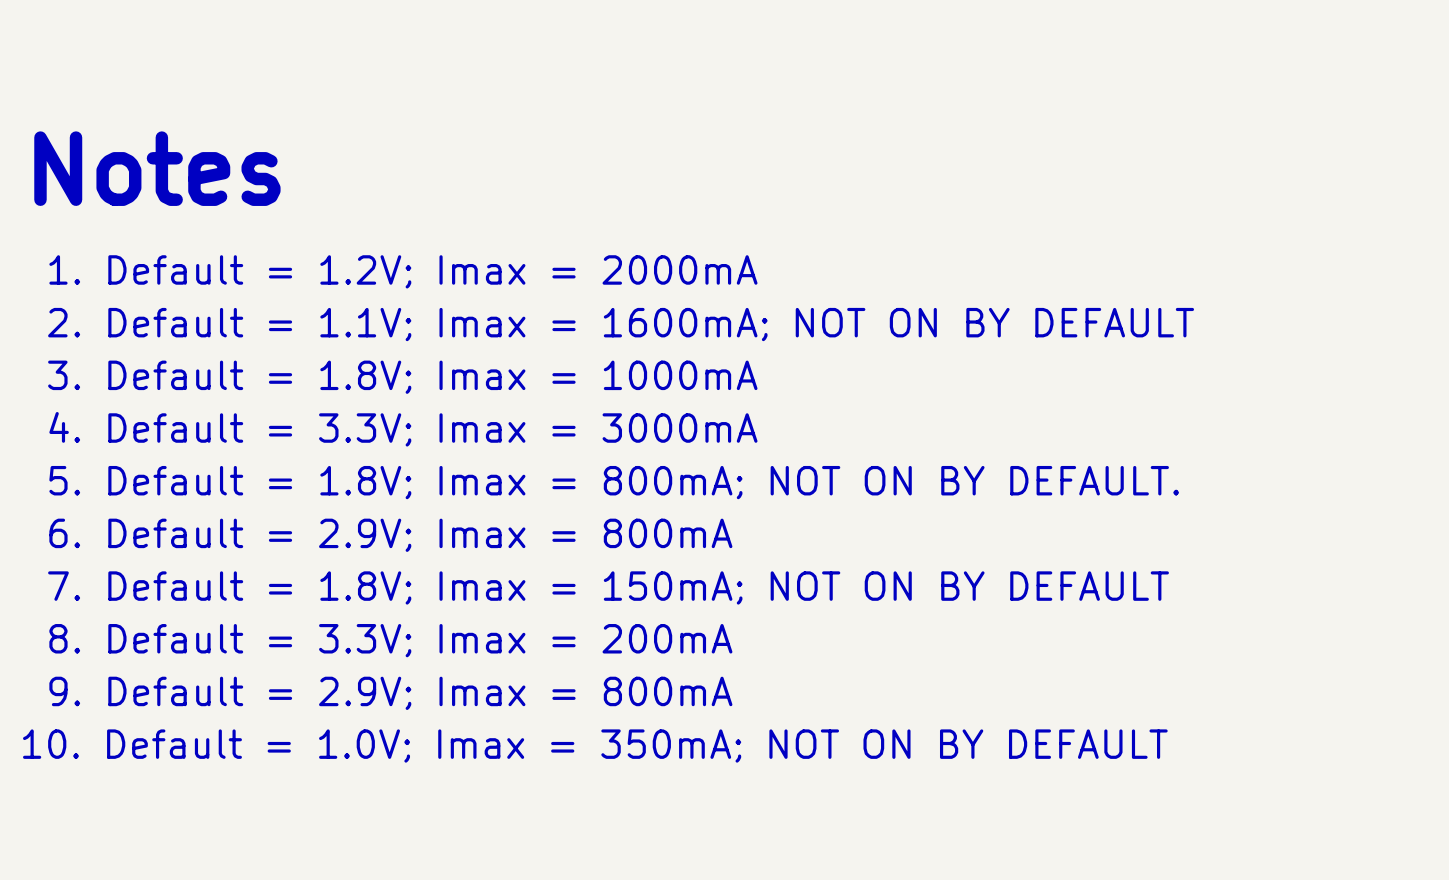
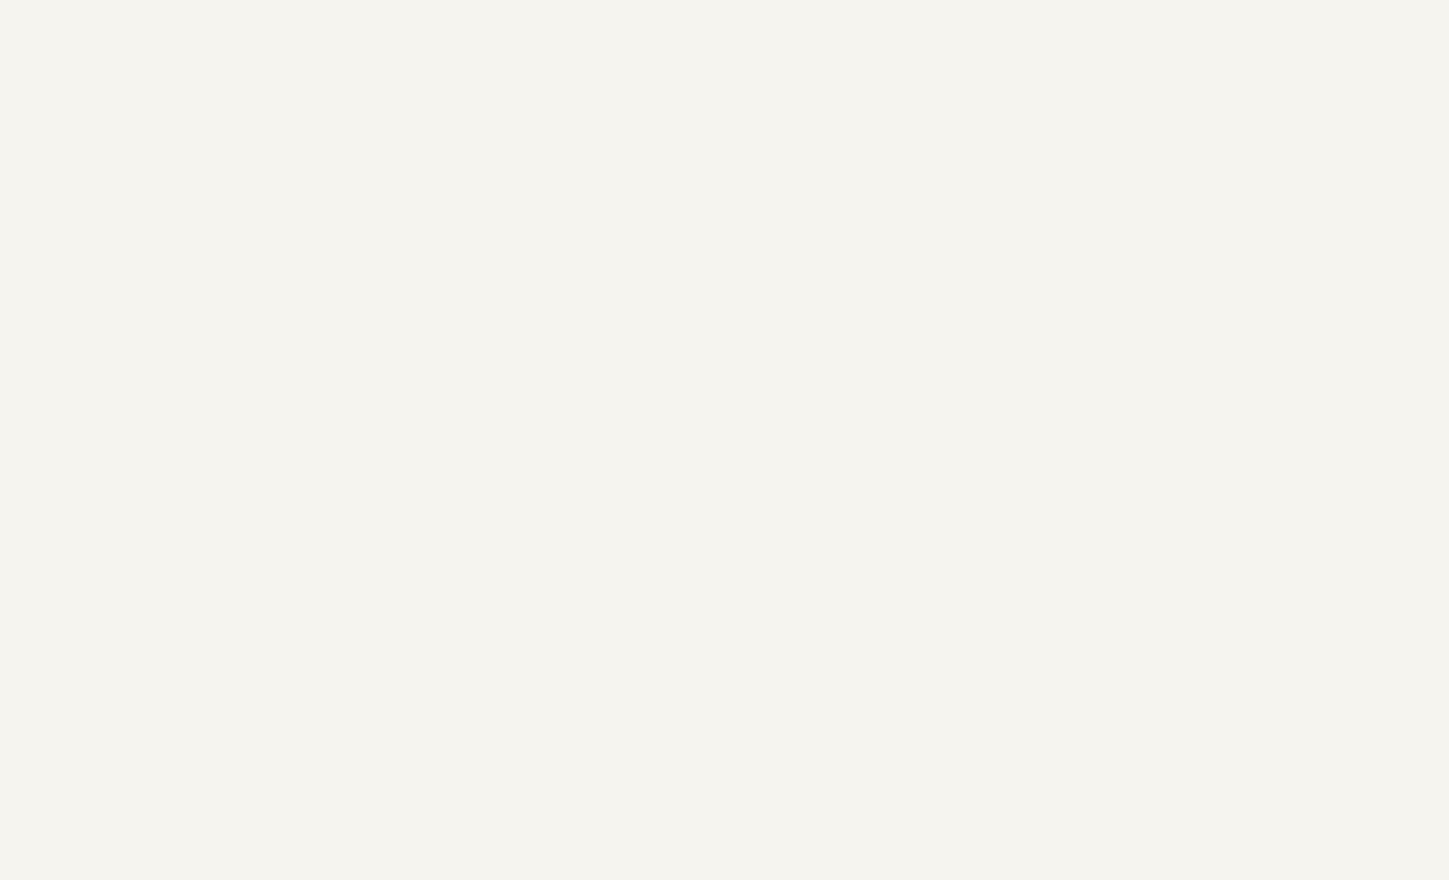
text: Notes (157, 168) -> none
text: 1. Default = 1.2V; Imax = 2000mA (403, 271) -> none
text: 2. Default = 1.1V; Imax = 1600mA; NOT ON BY DEFAULT (621, 324) -> none
text: 3. Default = 1.8V; Imax = 1000mA (402, 377) -> none
text: 4. Default = 3.3V; Imax = 3000mA (403, 429) -> none
text: 5. Default = 1.8V; Imax = 800mA; NOT ON BY DEFAULT. (614, 482) -> none
text: 6. Default = 2.9V; Imax = 800mA (390, 535) -> none
text: 7. Default = 1.8V; Imax = 150mA; NOT ON BY DEFAULT (608, 587) -> none
text: 8. Default = 3.3V; Imax = 200mA (390, 640) -> none
text: 9. Default = 2.9V; Imax = 800mA (390, 693) -> none
text: 10. Default = 1.0V; Imax = 350mA; NOT ON BY DEFAULT (595, 746) -> none

